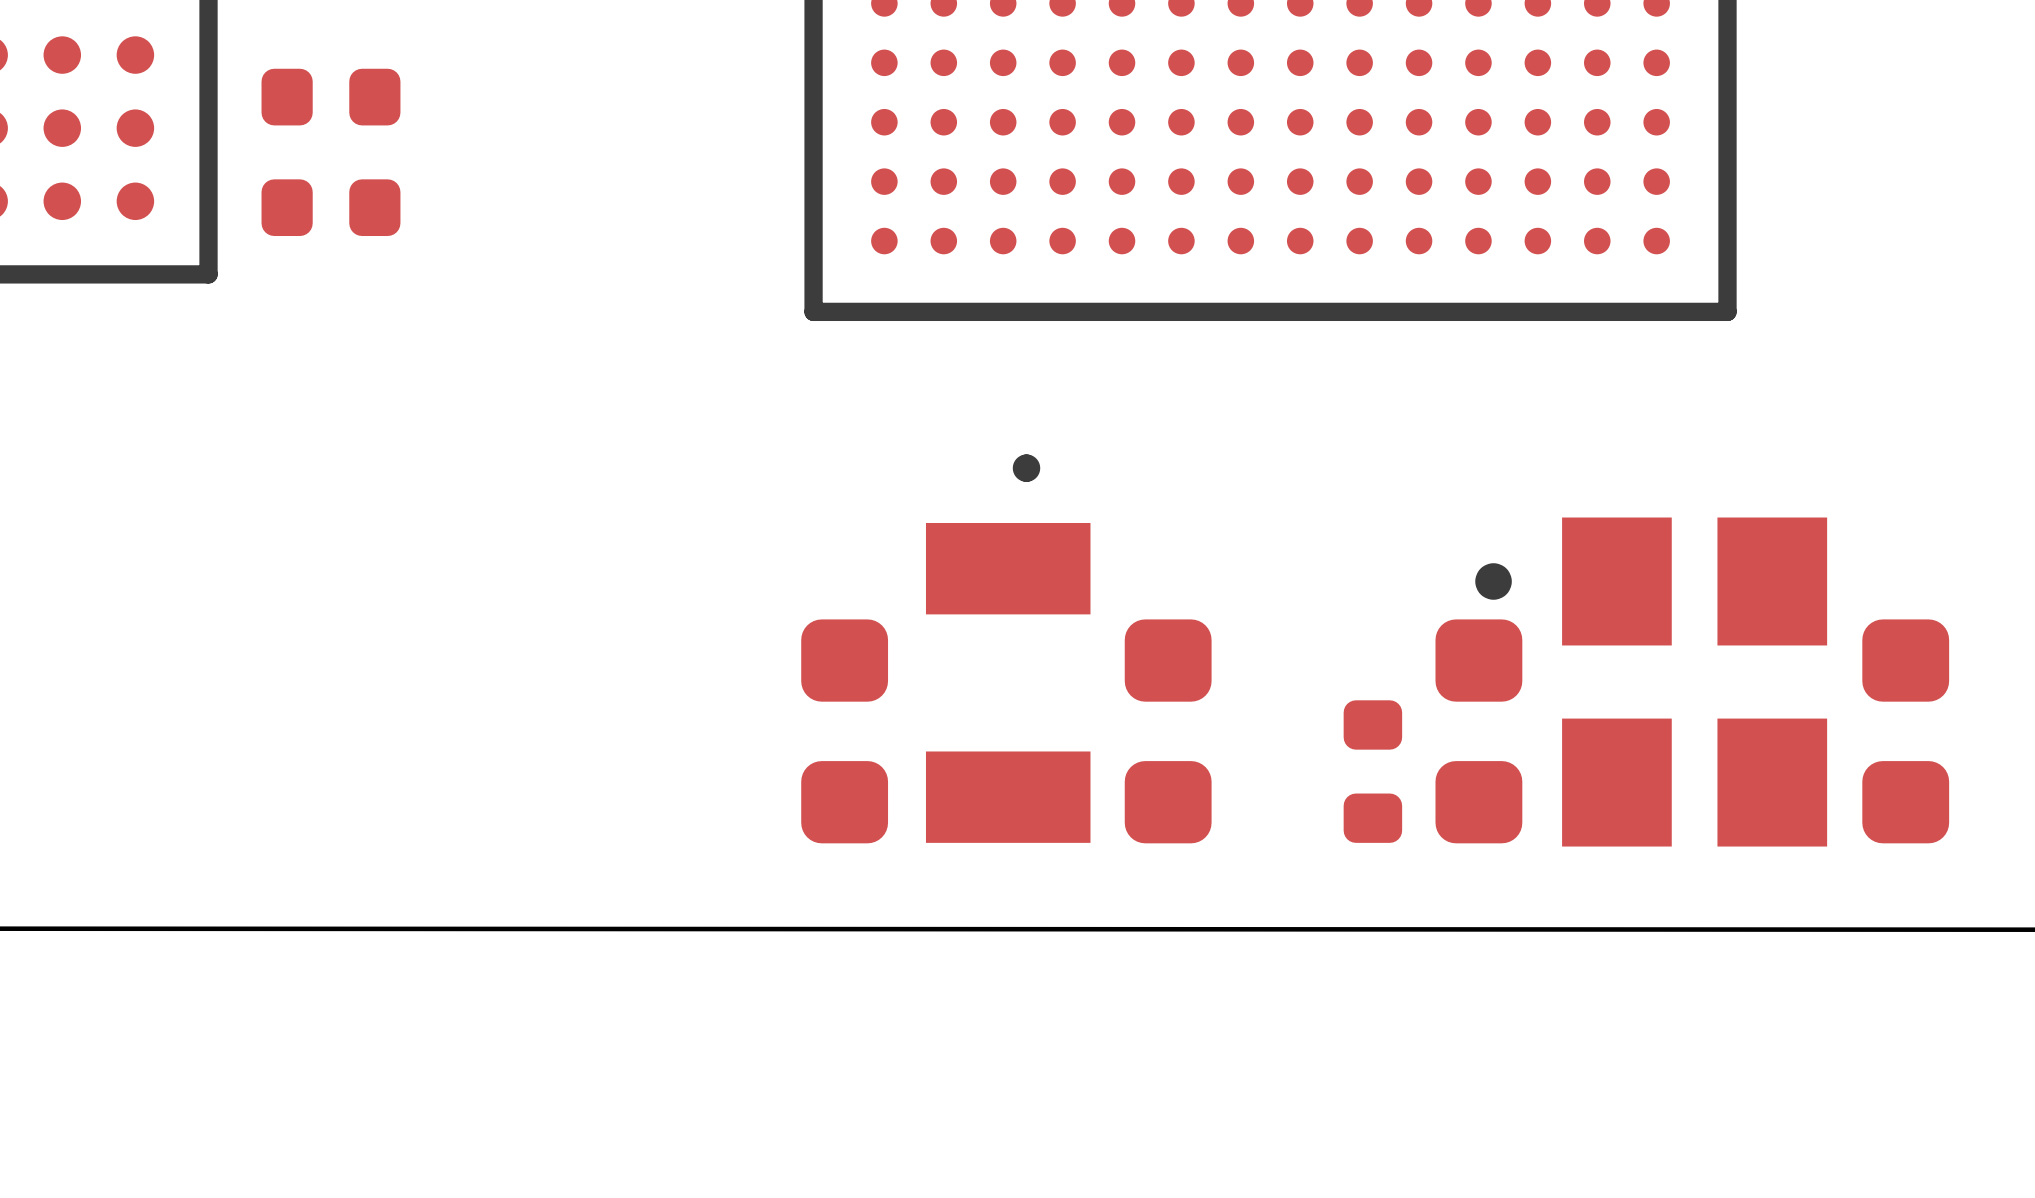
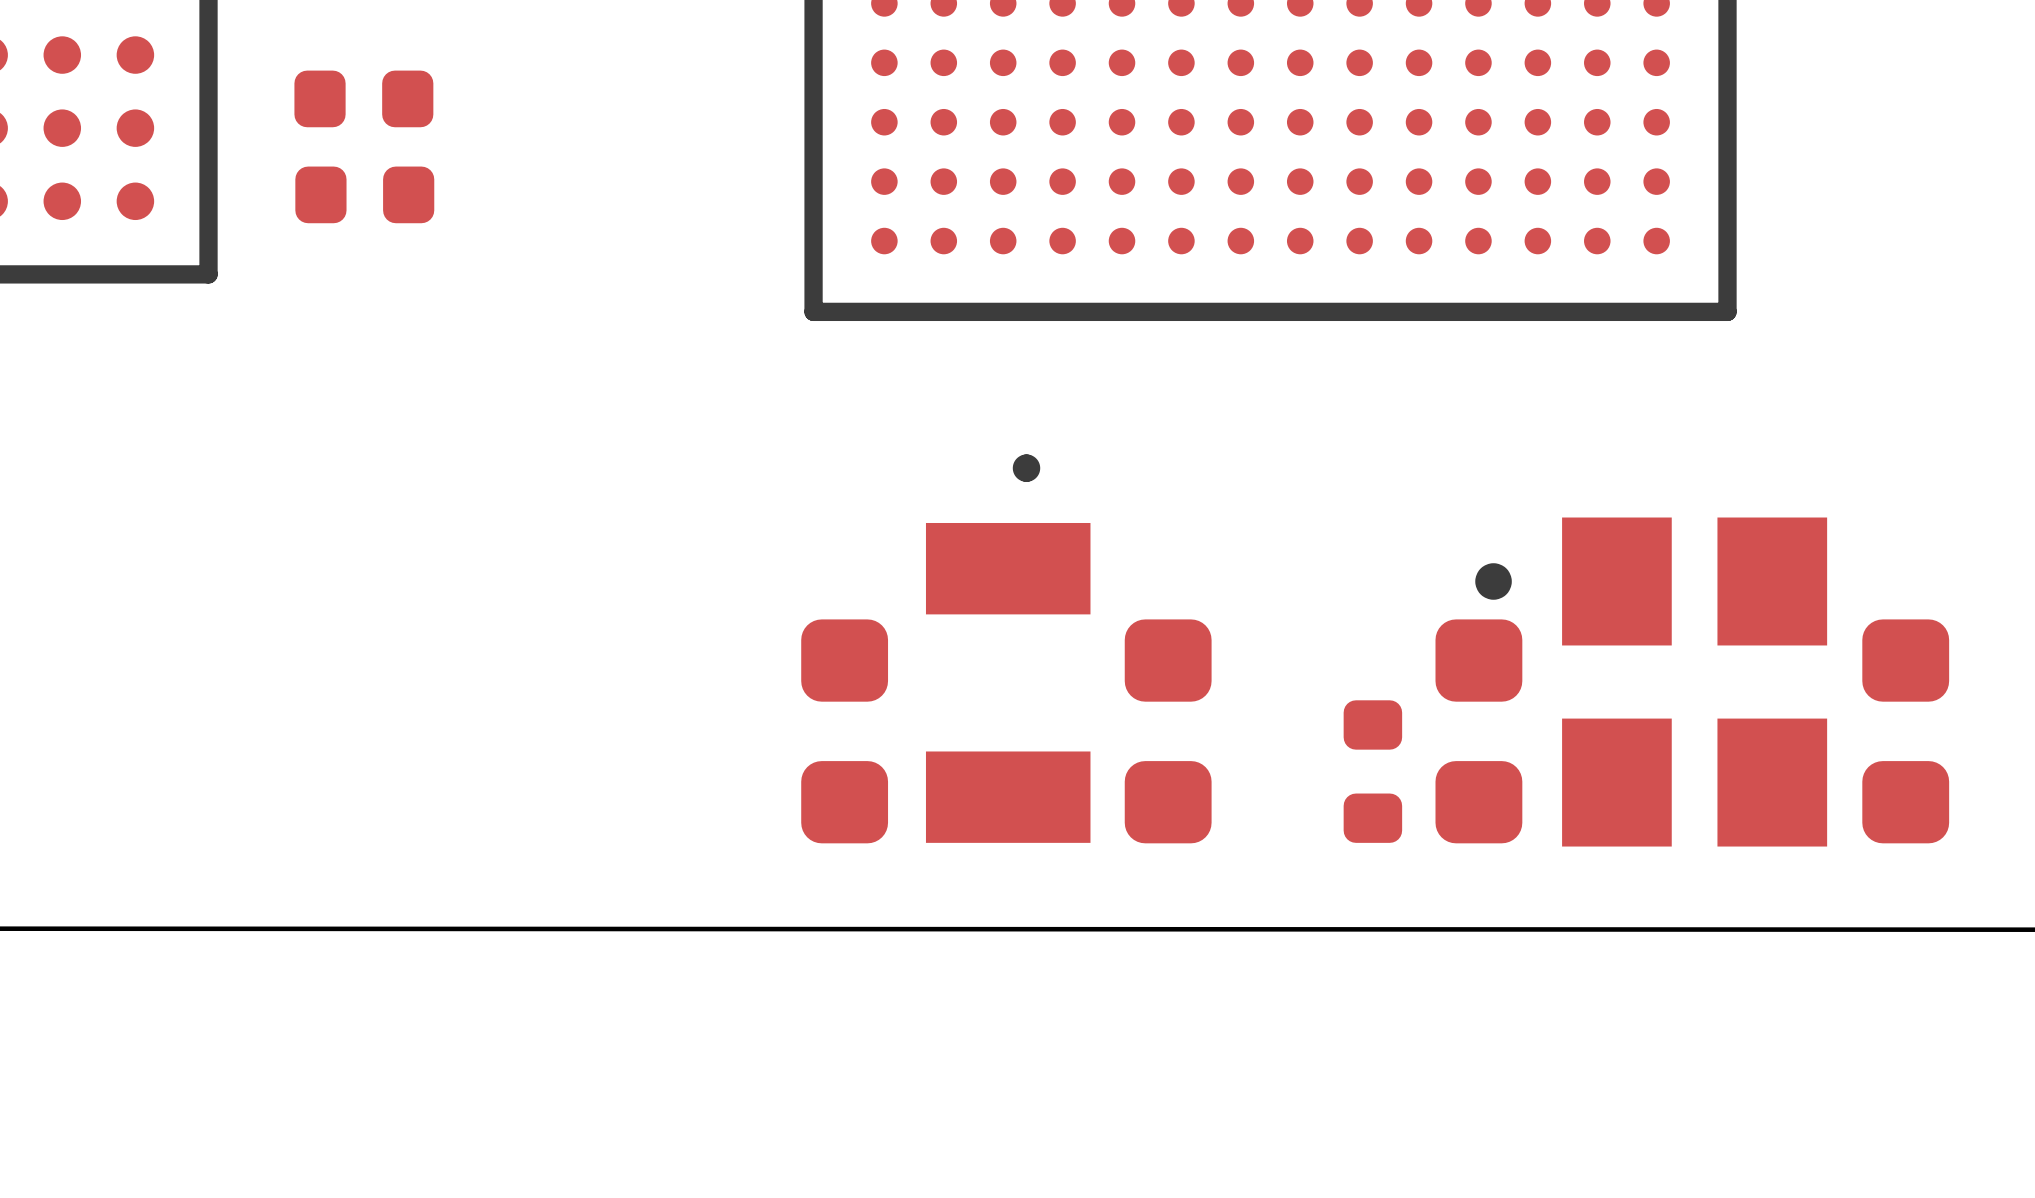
part position: (330, 97) -> (363, 98)
part position: (330, 207) -> (364, 194)

